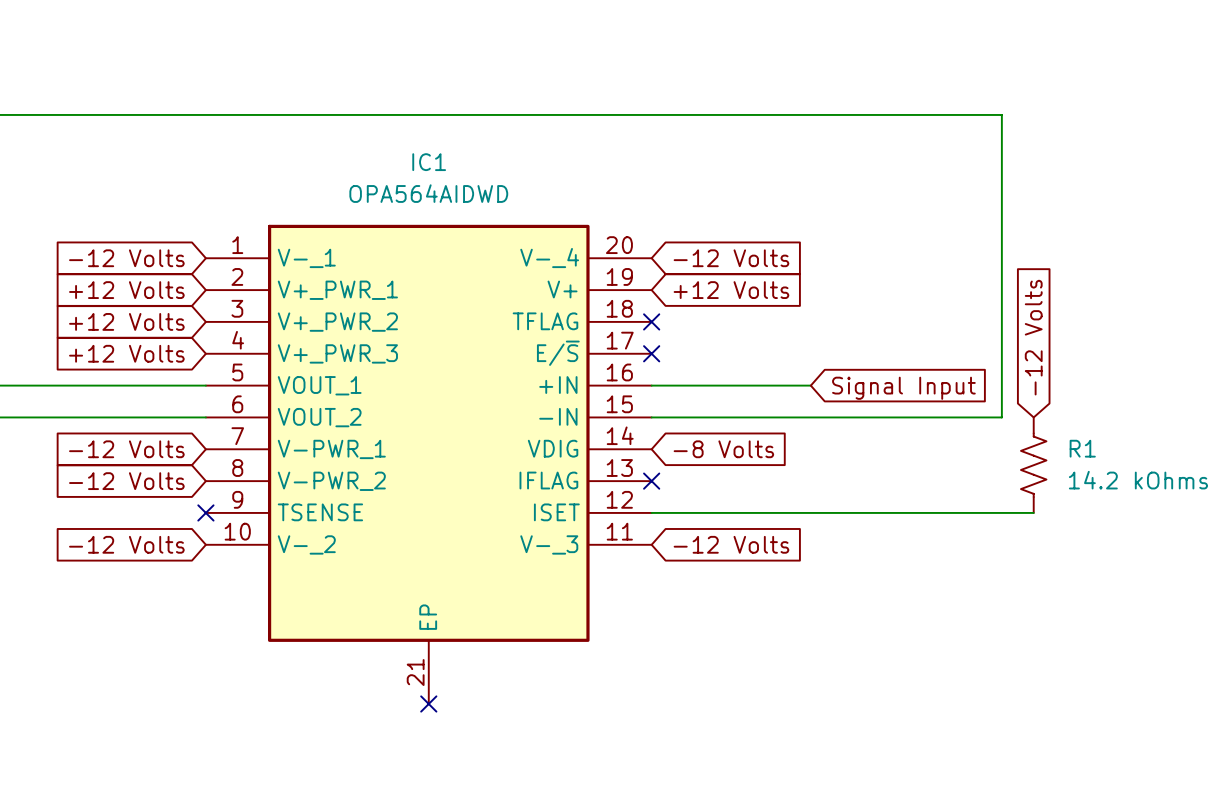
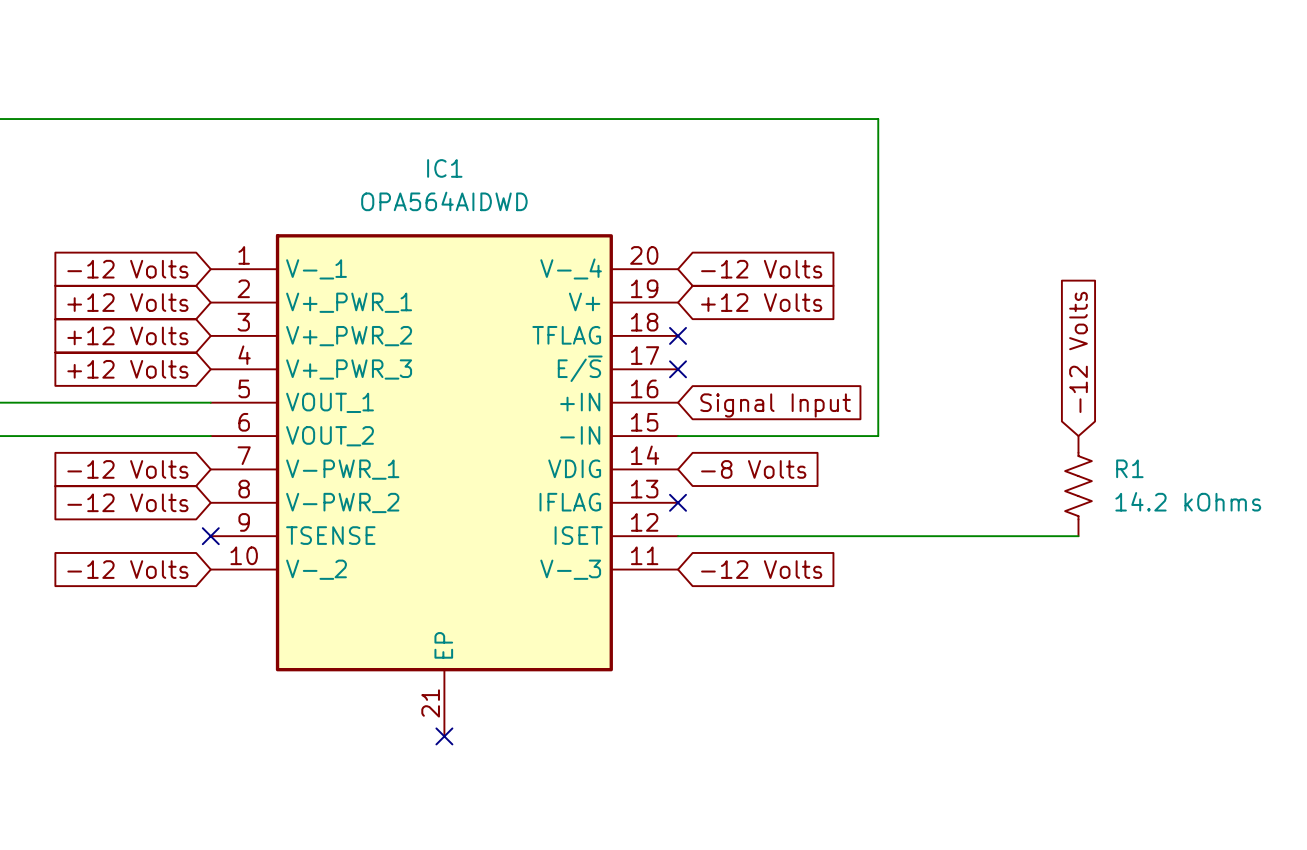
wire: (842, 114) (1001, 114) (1001, 417) (842, 417) -> (878, 119) (878, 436)
wire: (651, 385) (810, 385) -> none
global label position: Signal Input (903, 388) -> Signal Input (775, 405)

